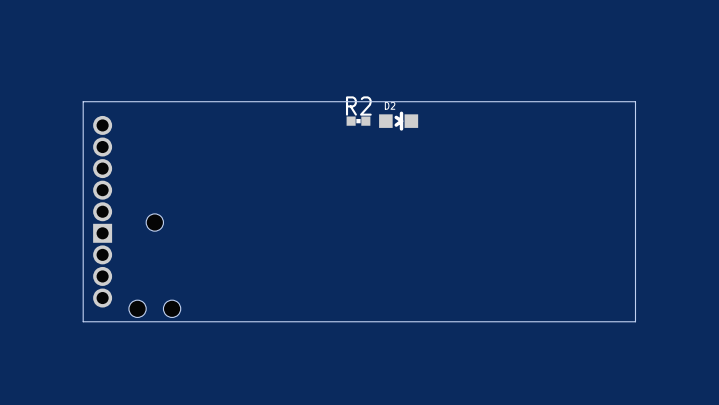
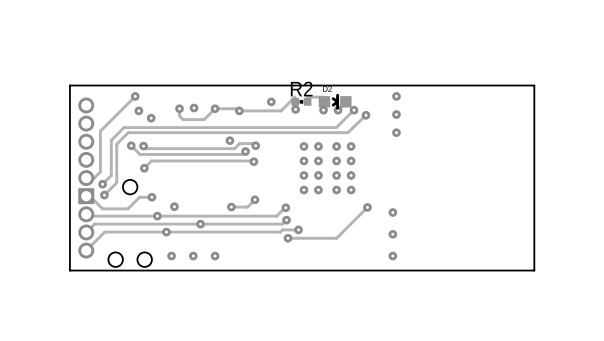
track: none -> (135, 96) (100, 131) (100, 171) (94, 178) (86, 178)
via: none -> (135, 96)
via: none -> (396, 96)
track: none -> (323, 97) (307, 97)
via: none -> (271, 101)
via: none -> (194, 108)
track: none -> (179, 108) (179, 115) (183, 119) (204, 119) (215, 108) (281, 110) (294, 97) (295, 109)
via: none -> (179, 108)
via: none -> (215, 108)
via: none -> (295, 109)
via: none -> (138, 110)
via: none -> (239, 110)
via: none -> (323, 110)
via: none -> (338, 110)
track: none -> (354, 110) (336, 127) (124, 127) (111, 140) (111, 175) (102, 184)
via: none -> (354, 110)
via: none -> (396, 114)
track: none -> (366, 115) (347, 132) (128, 132) (116, 144) (116, 182) (104, 195)
via: none -> (366, 115)
via: none -> (151, 118)
via: none -> (396, 132)
via: none -> (229, 140)
track: none -> (131, 145) (139, 154) (242, 154) (245, 151)
via: none -> (131, 145)
via: none -> (143, 146)
track: none -> (255, 145) (253, 143) (239, 143) (234, 148) (146, 148) (143, 146)
via: none -> (255, 145)
via: none -> (303, 146)
via: none -> (318, 146)
via: none -> (336, 146)
via: none -> (351, 146)
via: none -> (245, 151)
via: none -> (303, 160)
via: none -> (318, 160)
via: none -> (336, 160)
via: none -> (351, 160)
track: none -> (253, 161) (151, 160) (144, 168)
via: none -> (253, 161)
via: none -> (144, 168)
via: none -> (303, 175)
via: none -> (318, 175)
via: none -> (336, 175)
via: none -> (351, 175)
via: none -> (102, 184)
via: none -> (303, 190)
via: none -> (318, 190)
via: none -> (336, 190)
via: none -> (351, 190)
via: none -> (104, 195)
track: none -> (86, 196) (89, 196) (102, 208) (128, 208) (139, 197) (151, 197)
via: none -> (151, 197)
track: none -> (254, 199) (247, 207) (231, 207)
via: none -> (254, 199)
via: none -> (174, 206)
via: none -> (231, 207)
track: none -> (367, 207) (336, 238) (287, 238)
via: none -> (367, 207)
track: none -> (285, 207) (276, 216) (88, 216) (86, 214)
via: none -> (285, 207)
via: none -> (392, 212)
via: none -> (157, 216)
track: none -> (286, 220) (282, 224) (94, 224) (86, 232)
via: none -> (286, 220)
via: none -> (200, 224)
track: none -> (298, 229) (282, 229) (280, 232) (104, 232) (86, 250)
via: none -> (298, 229)
via: none -> (166, 232)
via: none -> (392, 234)
via: none -> (287, 238)
via: none -> (171, 256)
via: none -> (193, 256)
via: none -> (215, 256)
via: none -> (392, 256)

